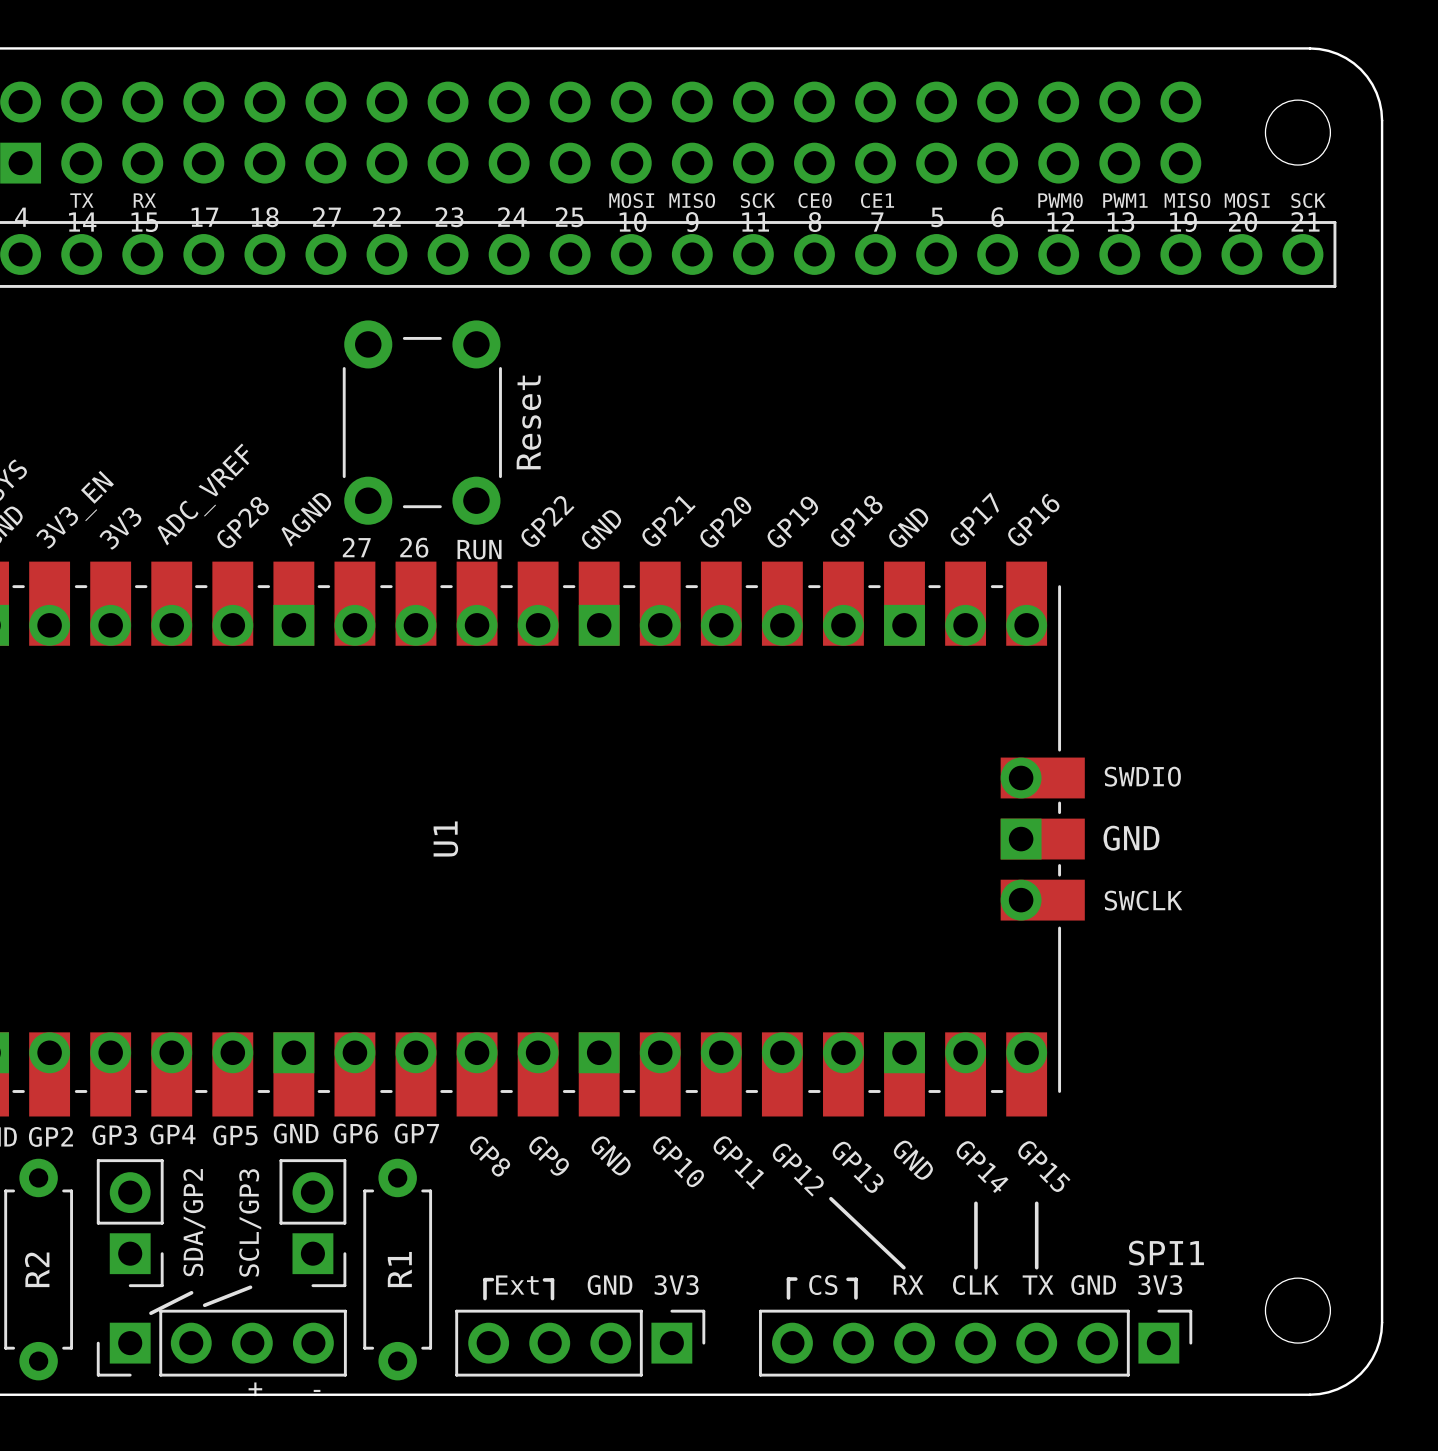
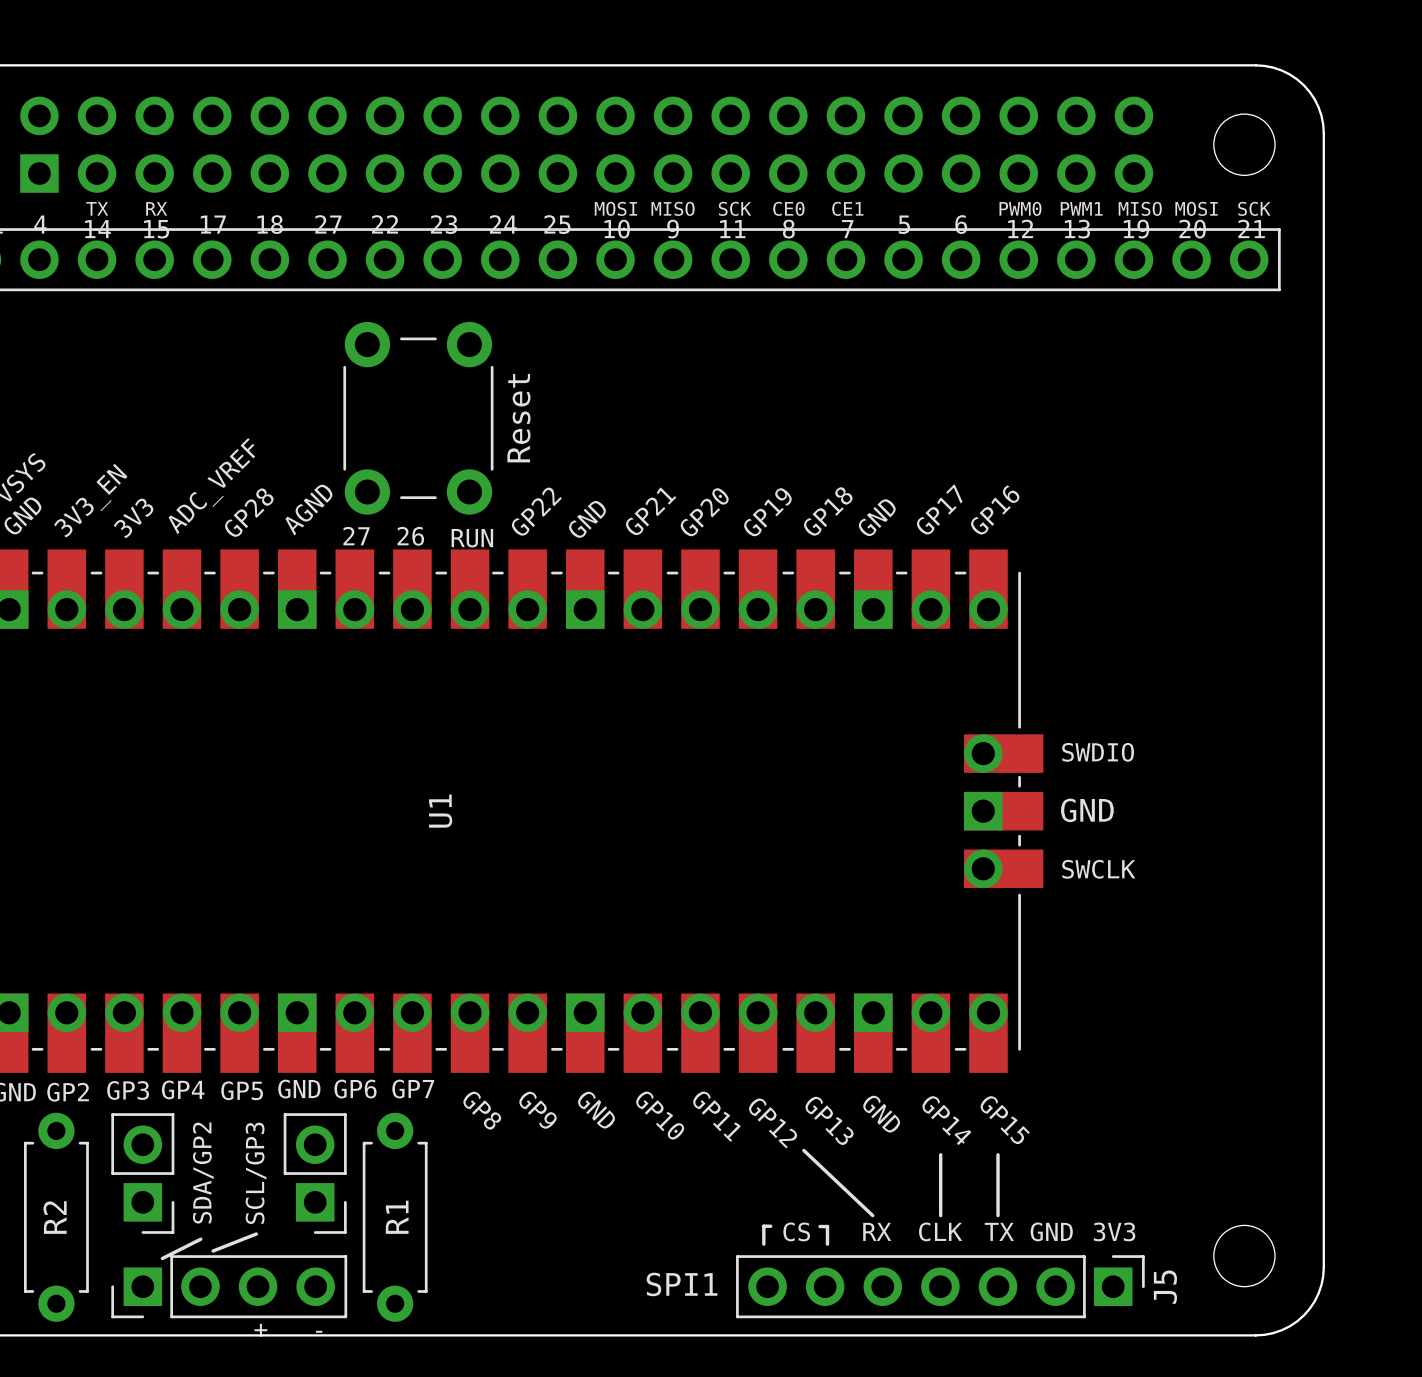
text position: SPI1 (1166, 1253) -> SPI1 (682, 1284)
line: (492, 1279) (485, 1279) (485, 1298) -> none
line: (544, 1279) (552, 1279) (552, 1298) -> none
text: Ext (517, 1285) -> none
text: GND (610, 1285) -> none
text: 3V3 (676, 1285) -> none
part: (580, 1343) -> none
J5 name: none -> J5 (1165, 1287)

